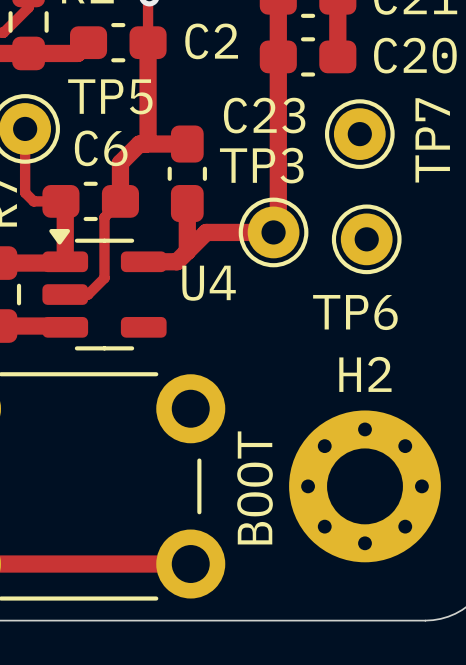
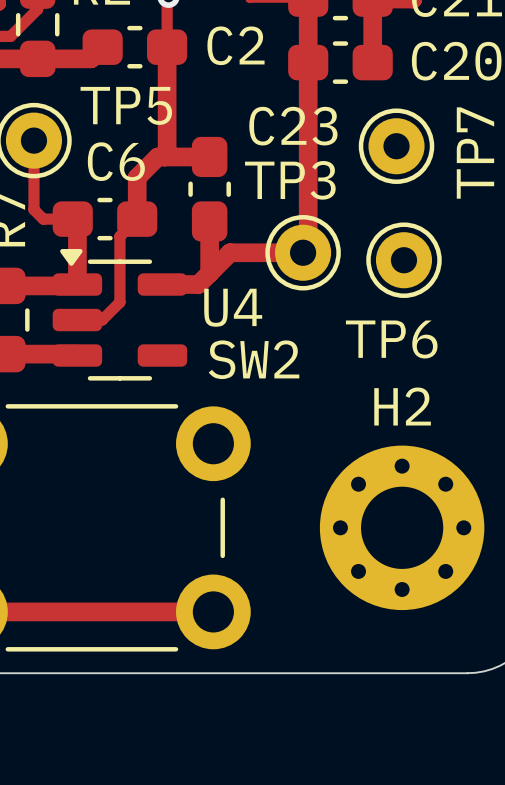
BOOT name: BOOT (255, 487) -> SW2 (254, 359)

